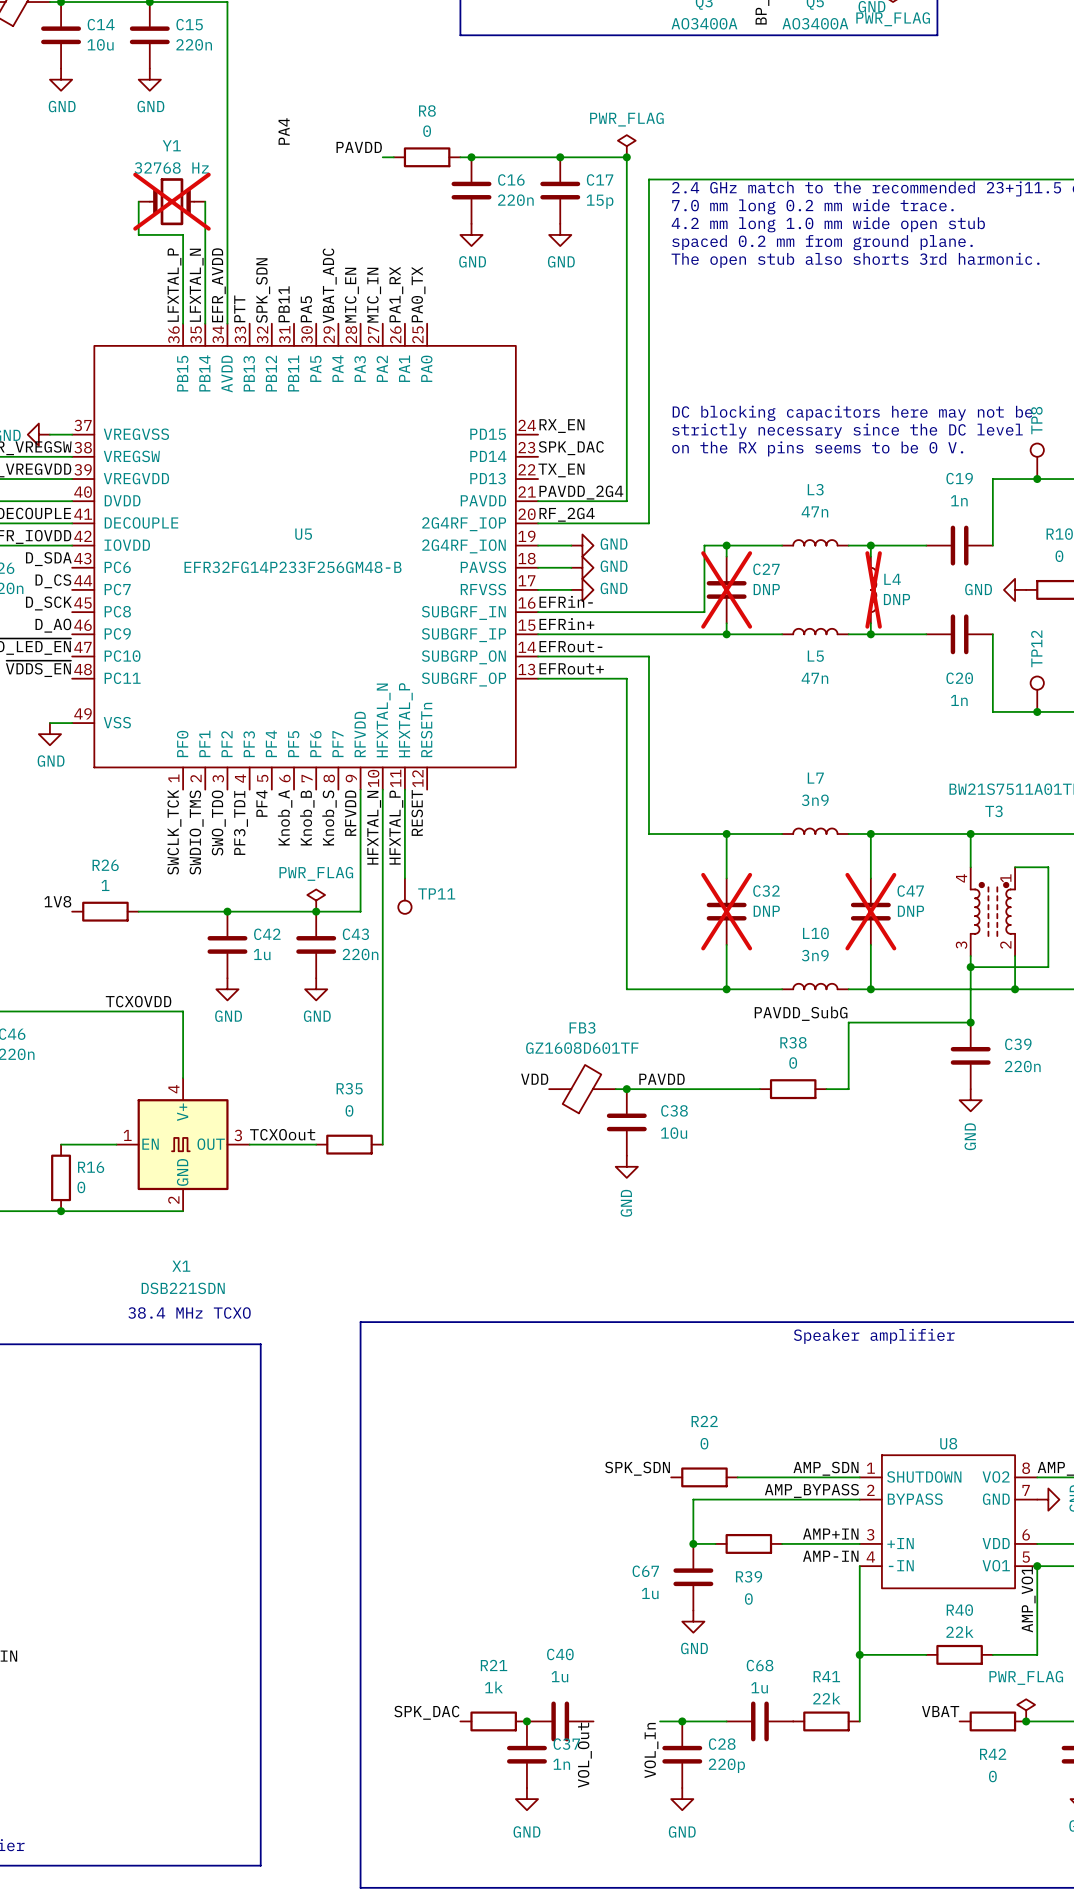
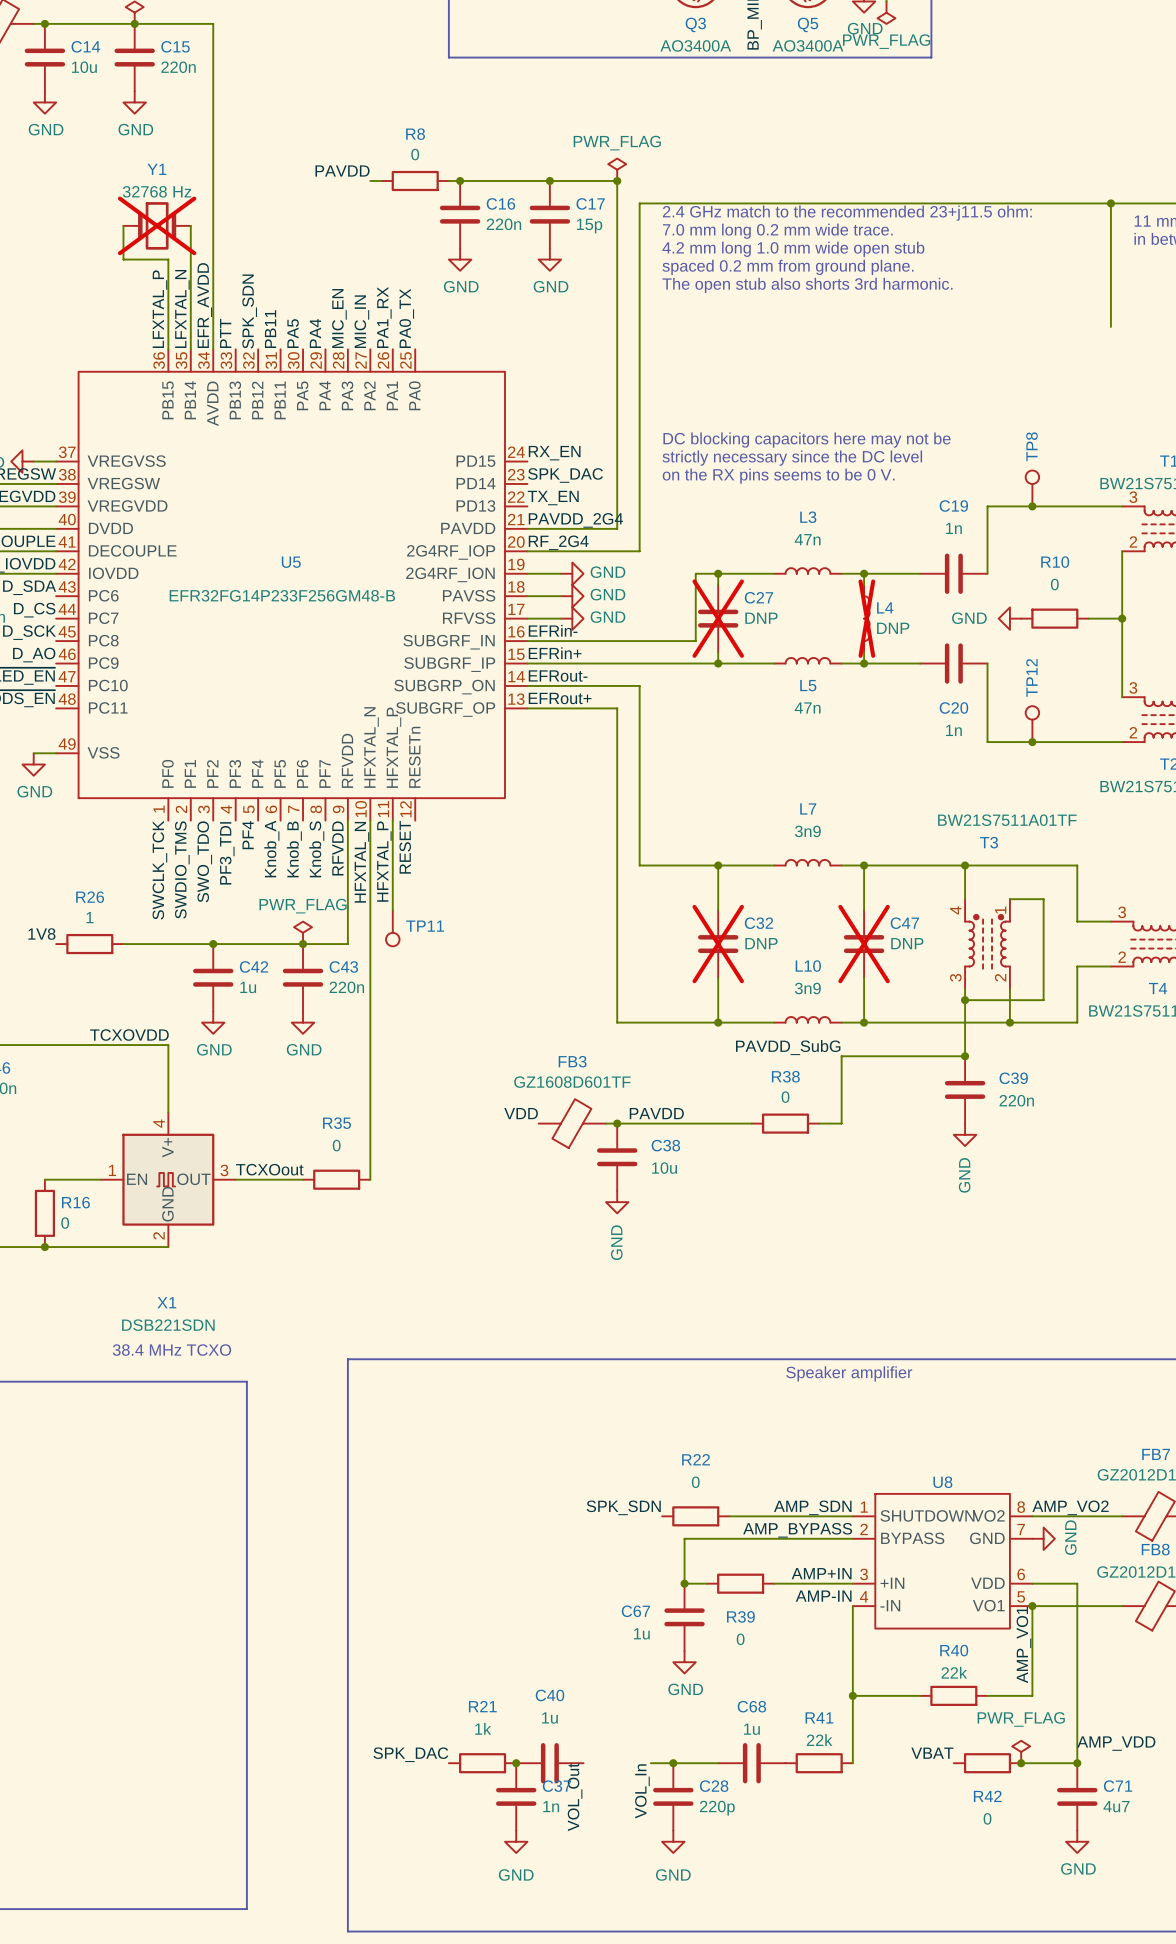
label: PA4 (284, 131) -> none
label: VBAT_ADC (329, 285) -> PA4 (315, 333)

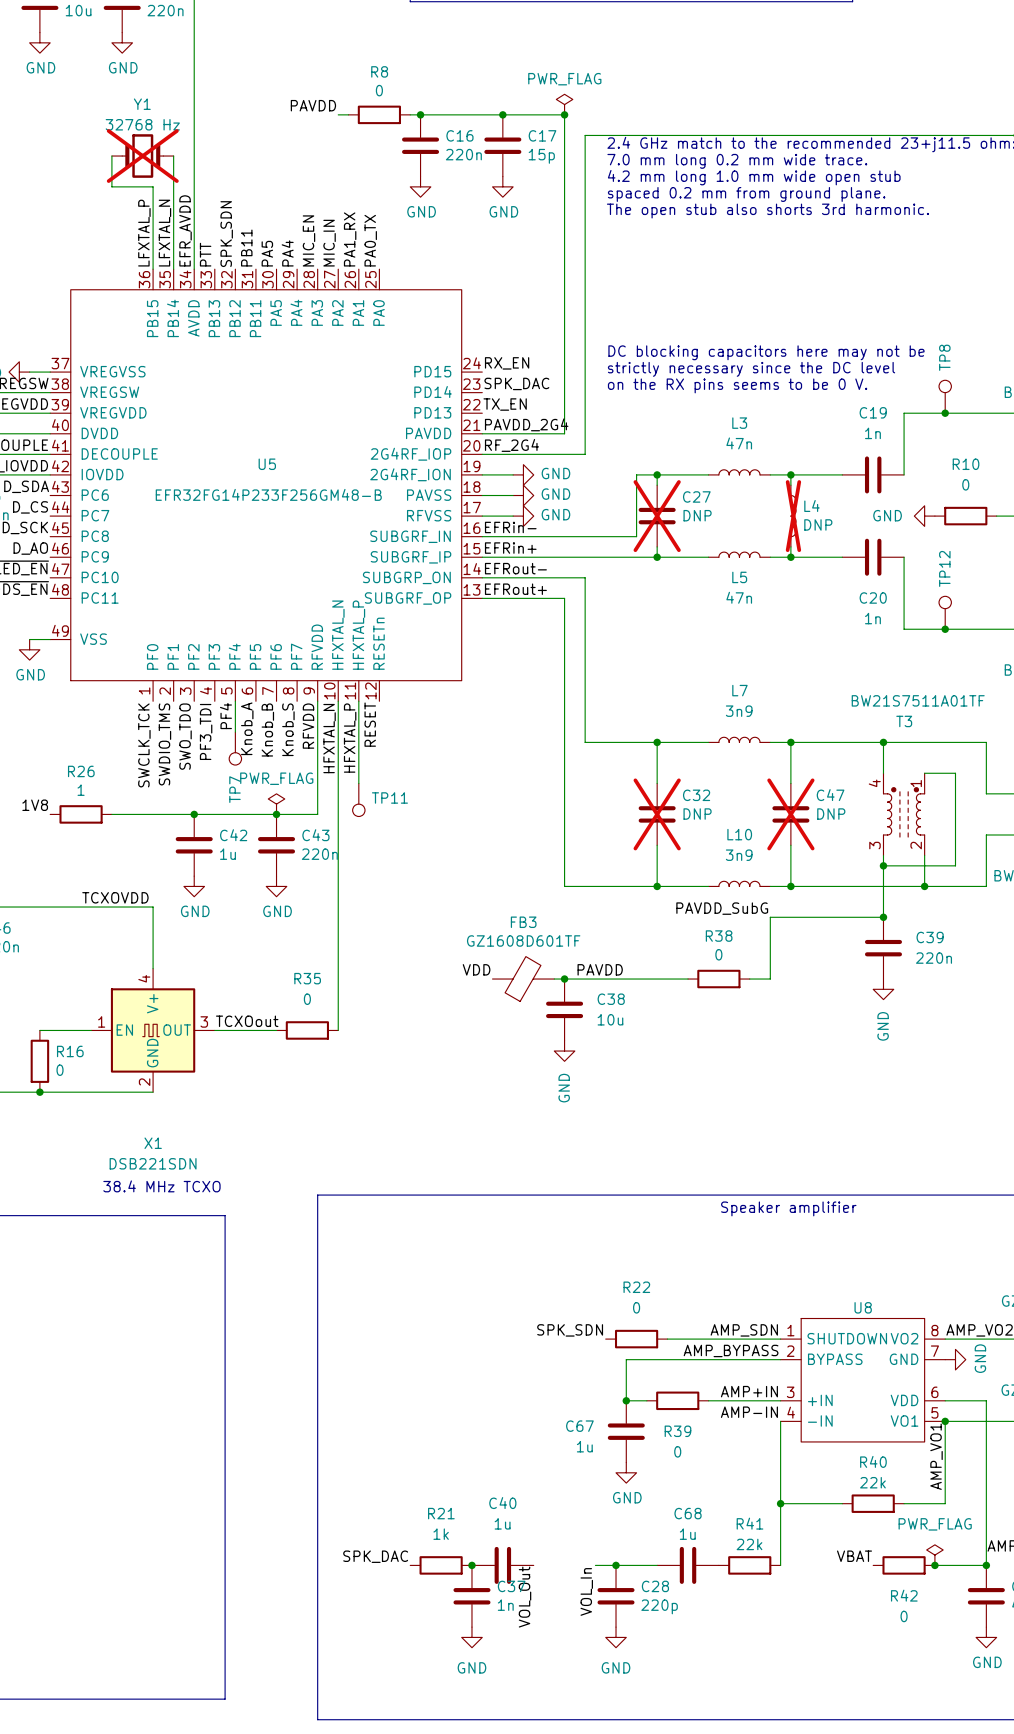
wire: none -> (235, 701) (235, 732)
TP7: none -> (235, 748)

